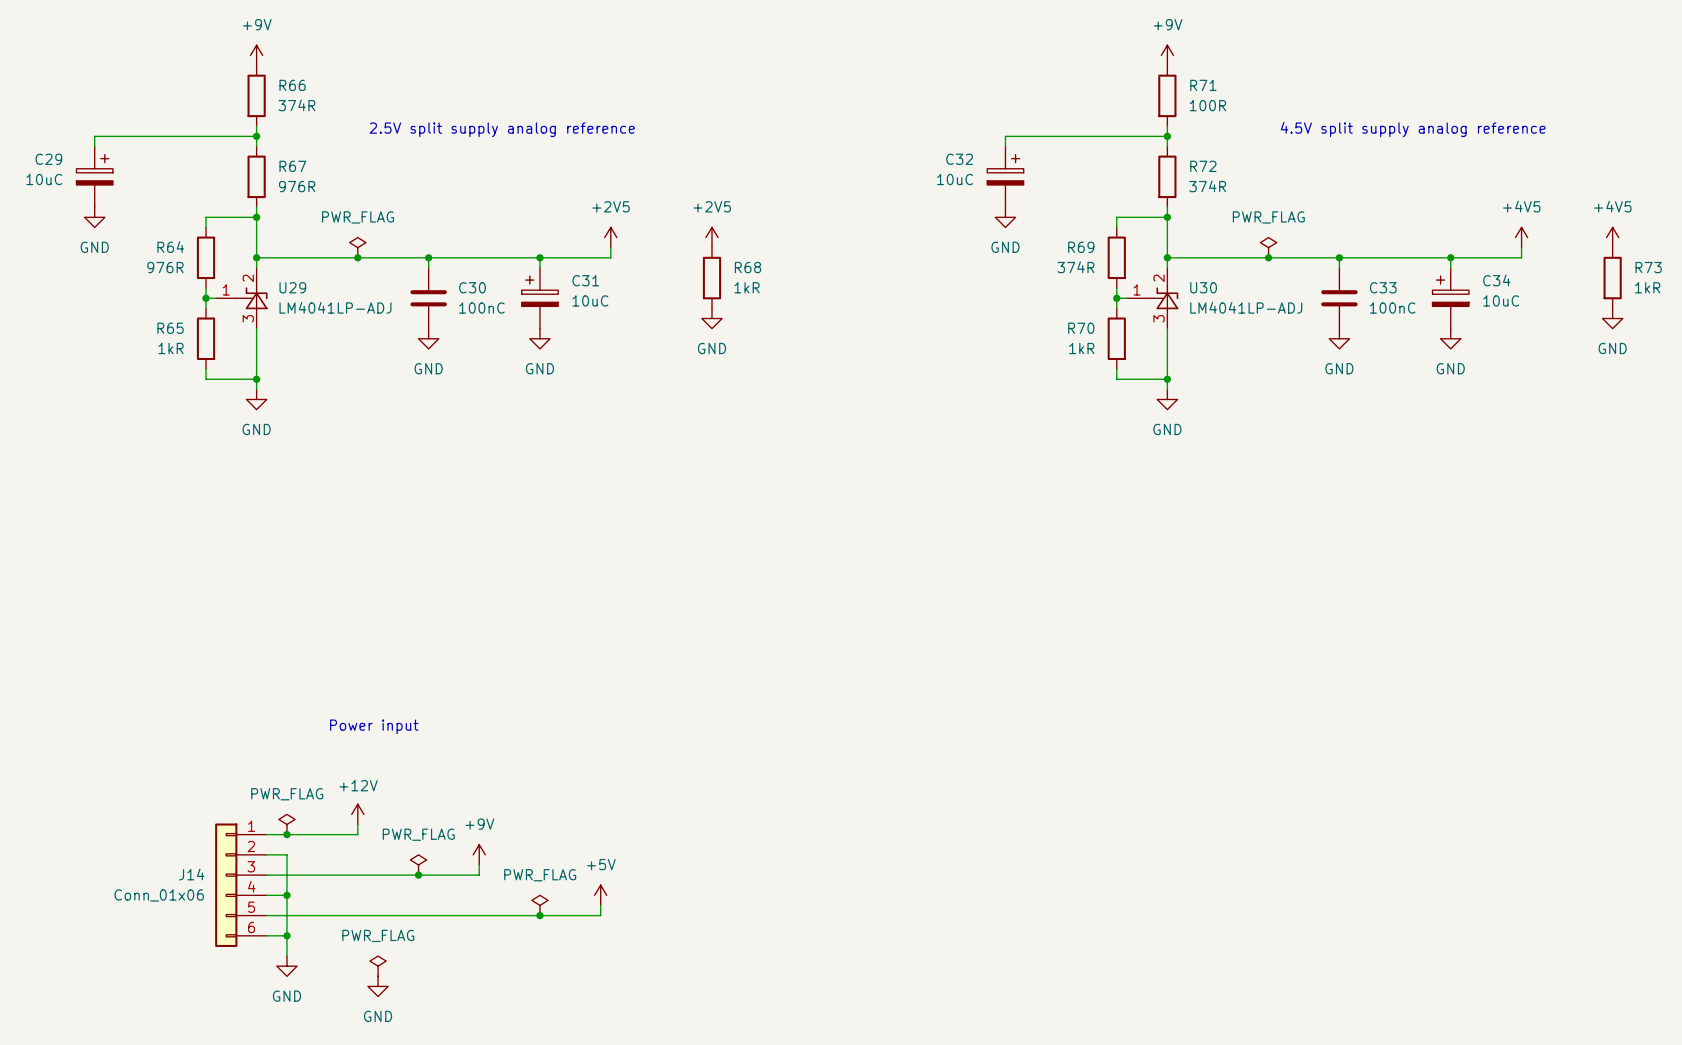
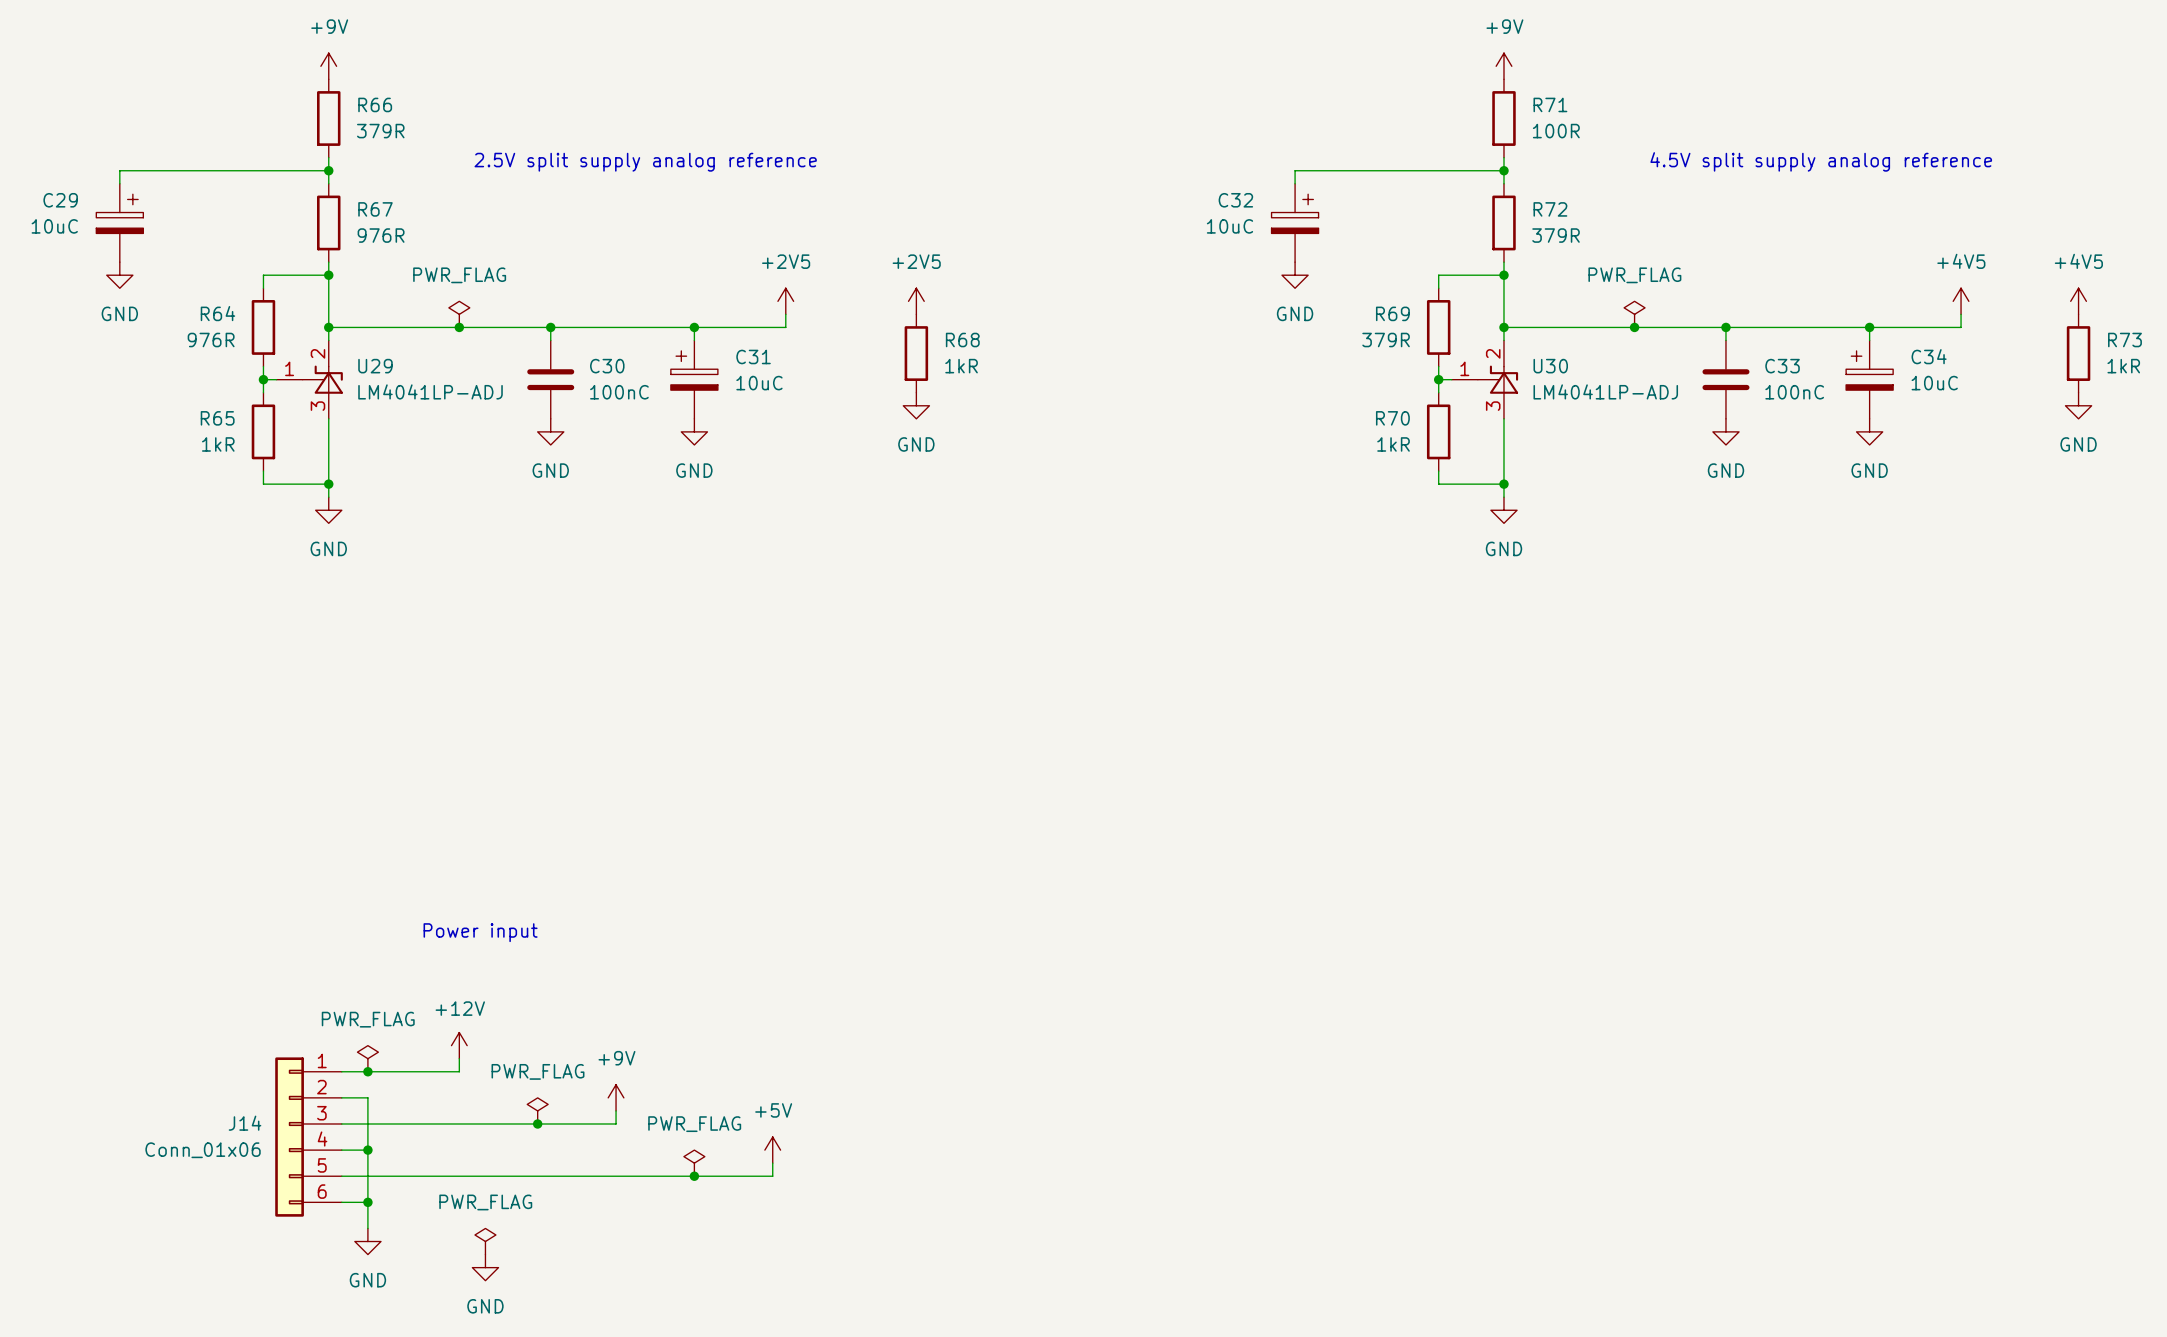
R66 value: 374R (296, 105) -> 379R (380, 131)
R72 value: 374R (1207, 186) -> 379R (1556, 235)
R69 value: 374R (1075, 267) -> 379R (1386, 340)

